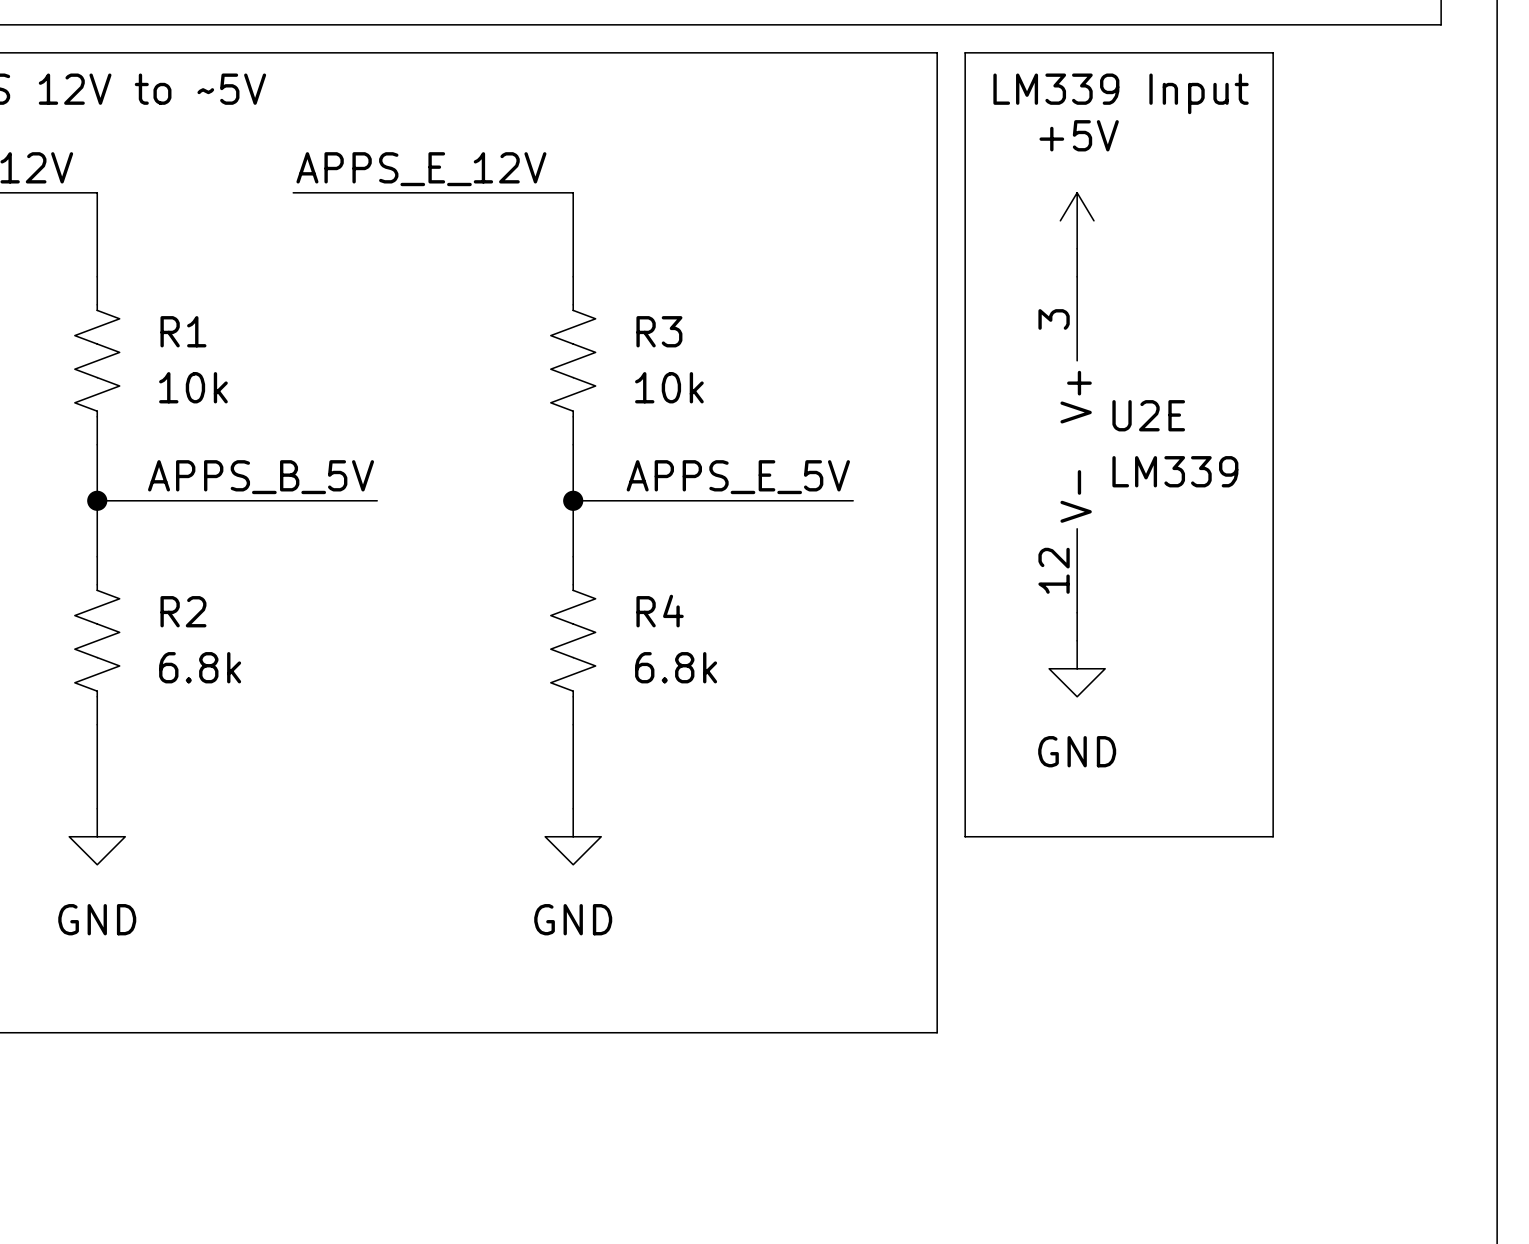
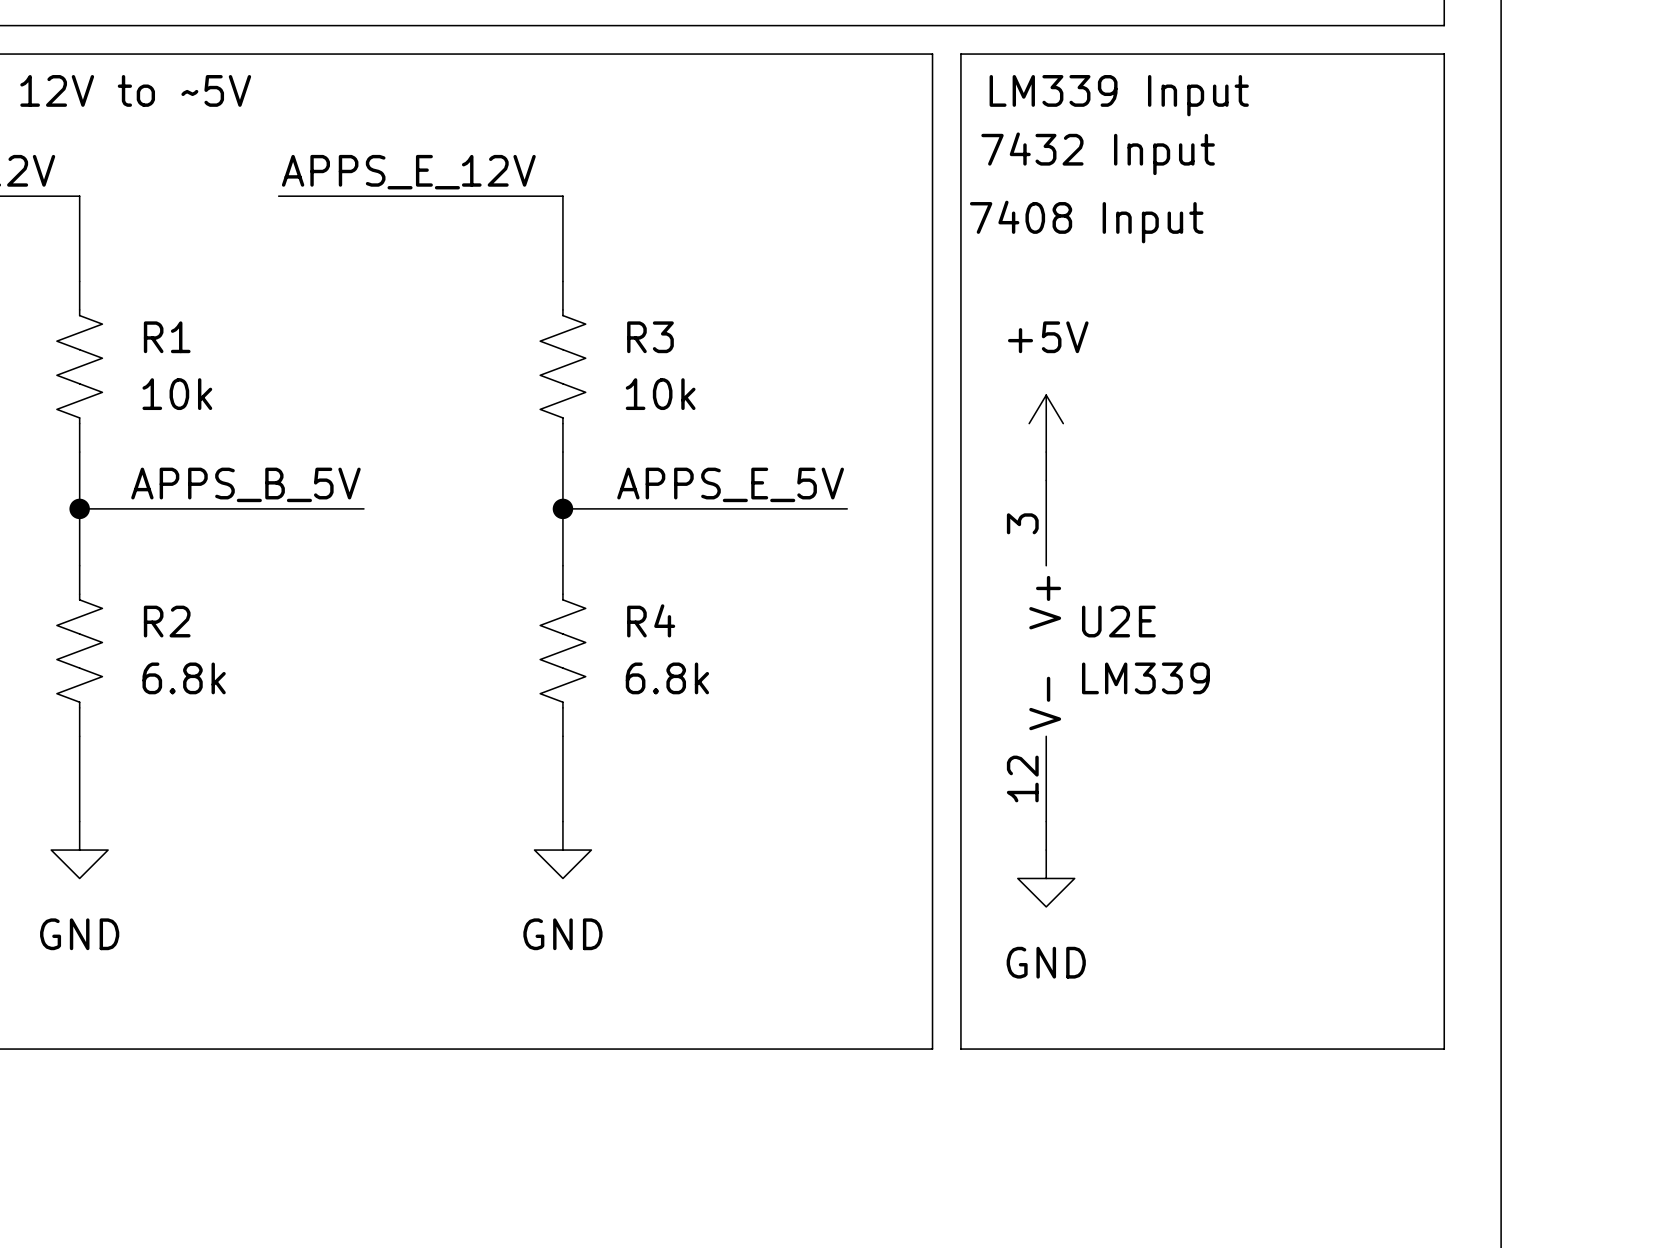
line: (1273, 52) (1273, 836) (965, 836) -> (1273, 54) (1444, 54) (1444, 1049) (960, 1049) (960, 850)
text: none -> 7432 Input (1098, 153)
text: none -> 7408 Input (1086, 222)
power symbol position: +5V (1077, 220) -> +5V (1046, 423)
wire: (1077, 248) (1077, 276) -> none
U2E position: (1077, 444) -> (1046, 651)
wire: (1077, 612) (1077, 640) -> (1046, 452) (1046, 480)
power symbol position: GND (1077, 668) -> GND (1046, 878)
wire: none -> (1046, 821) (1046, 850)

